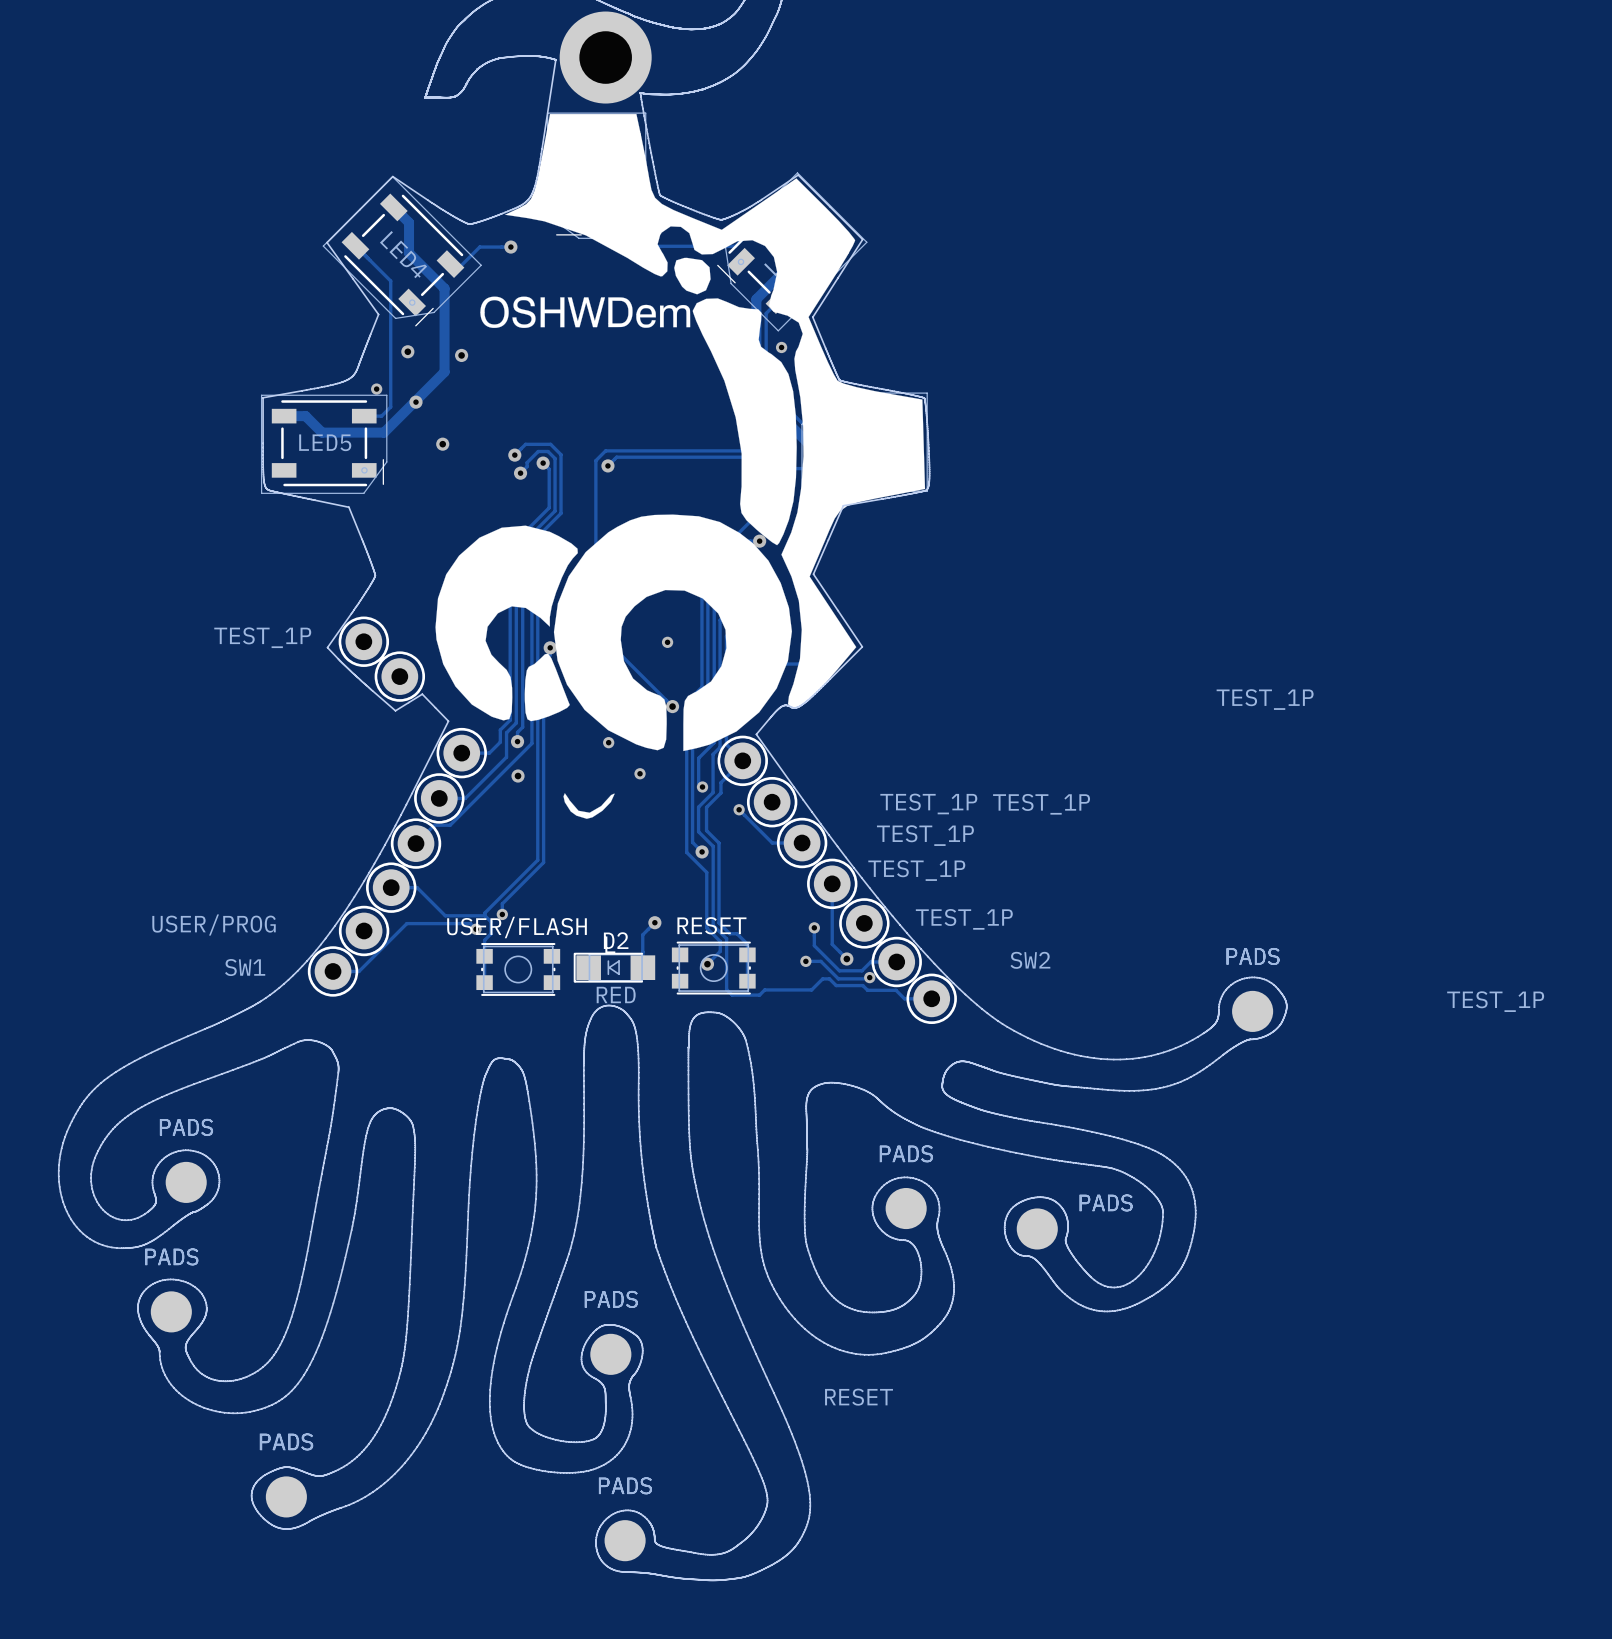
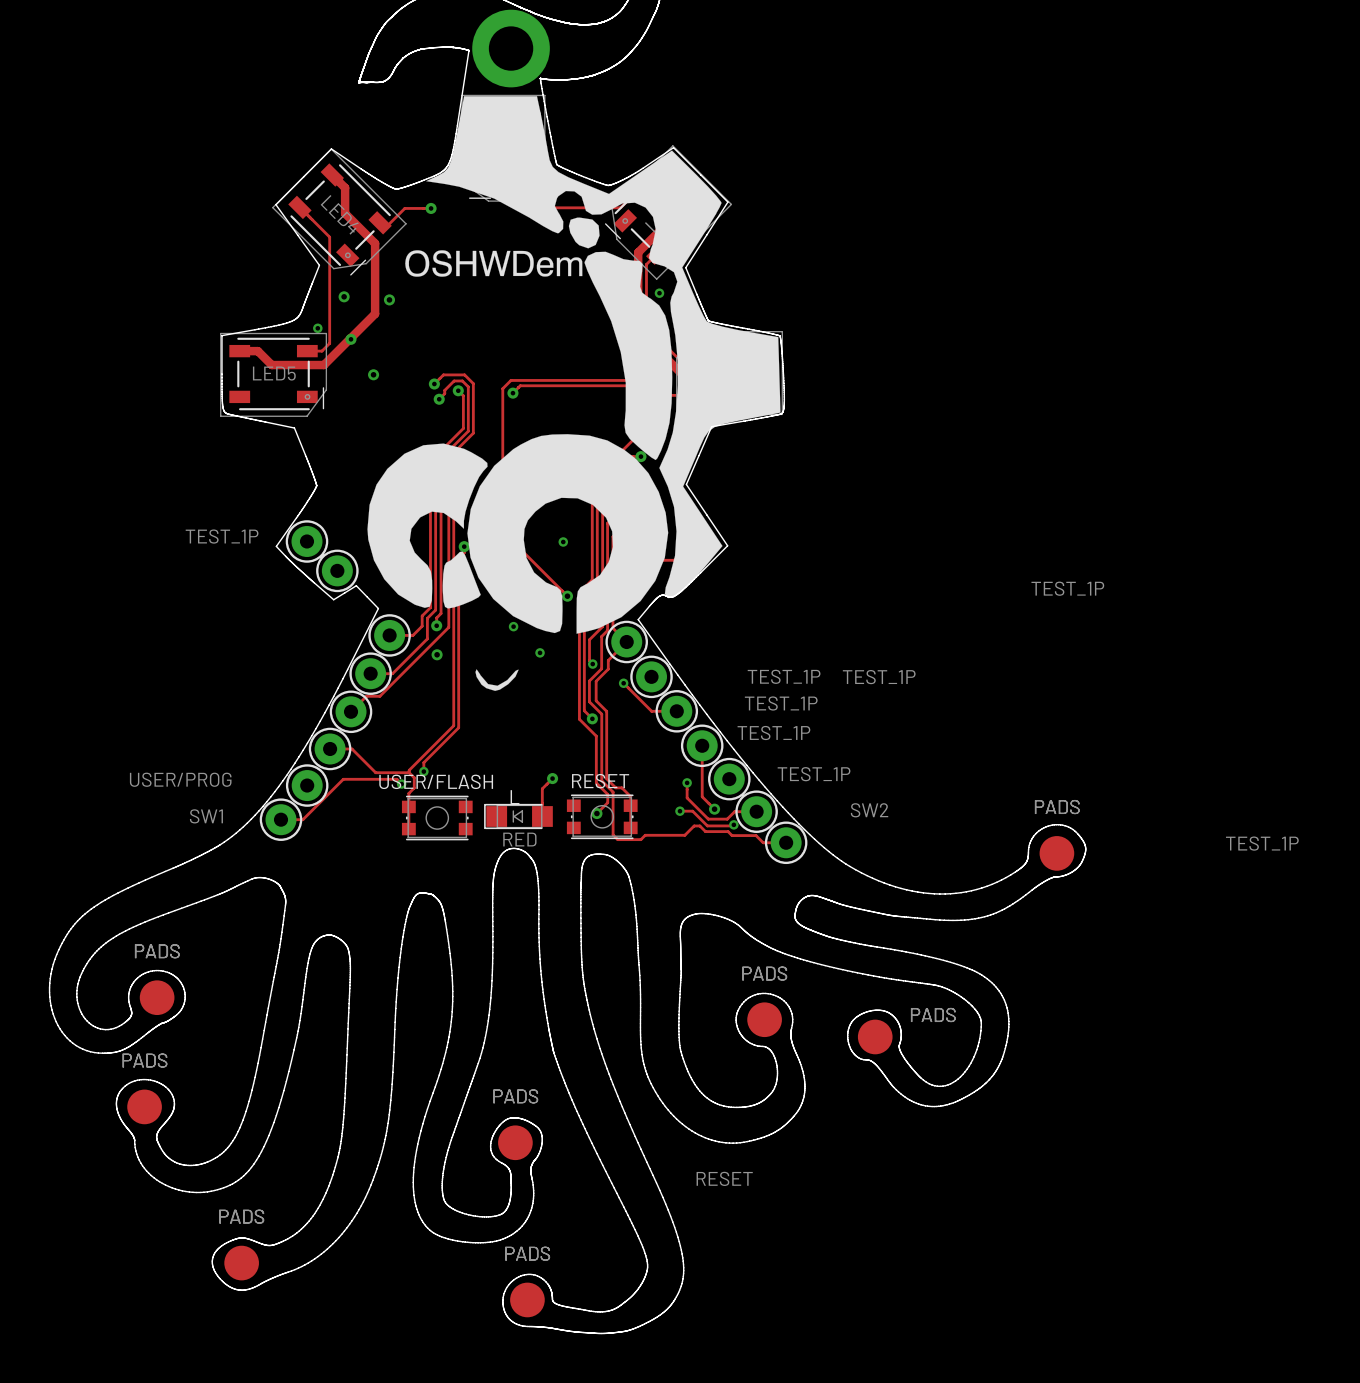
D2 name: D2 (616, 940) -> none

